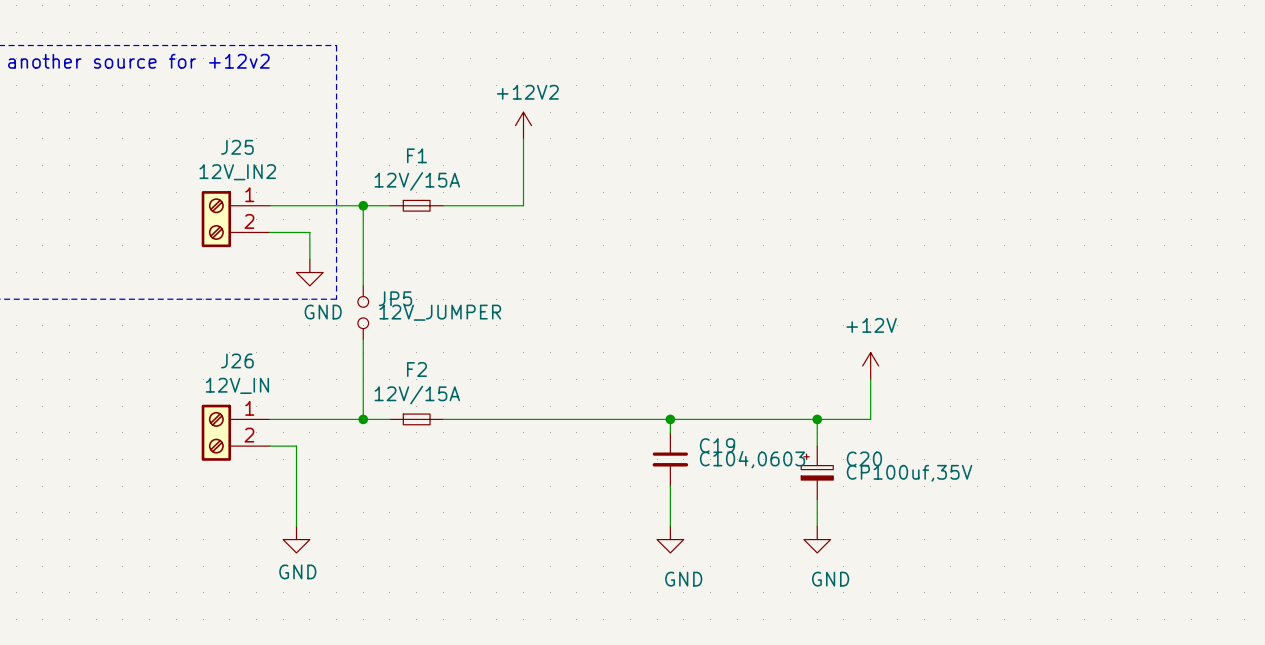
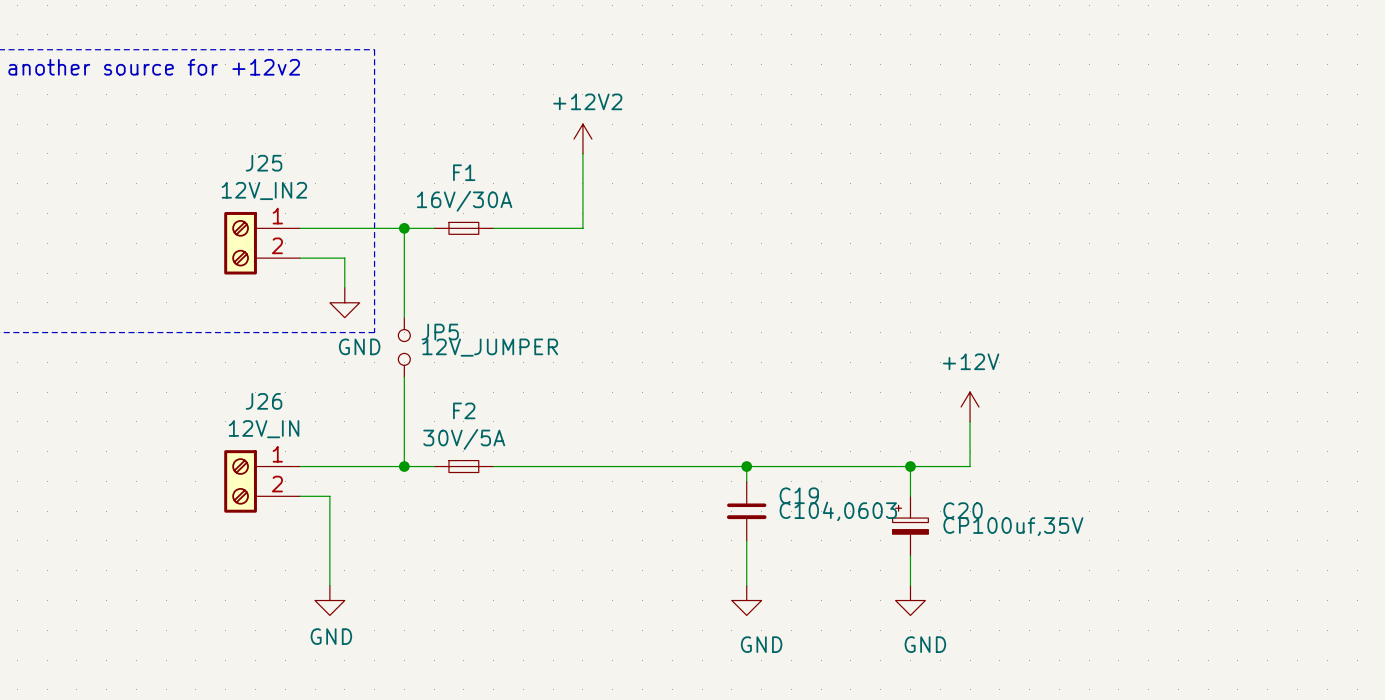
F1 value: 12V/15A (417, 181) -> 16V/30A (464, 201)
F2 value: 12V/15A (417, 395) -> 30V/5A (464, 439)

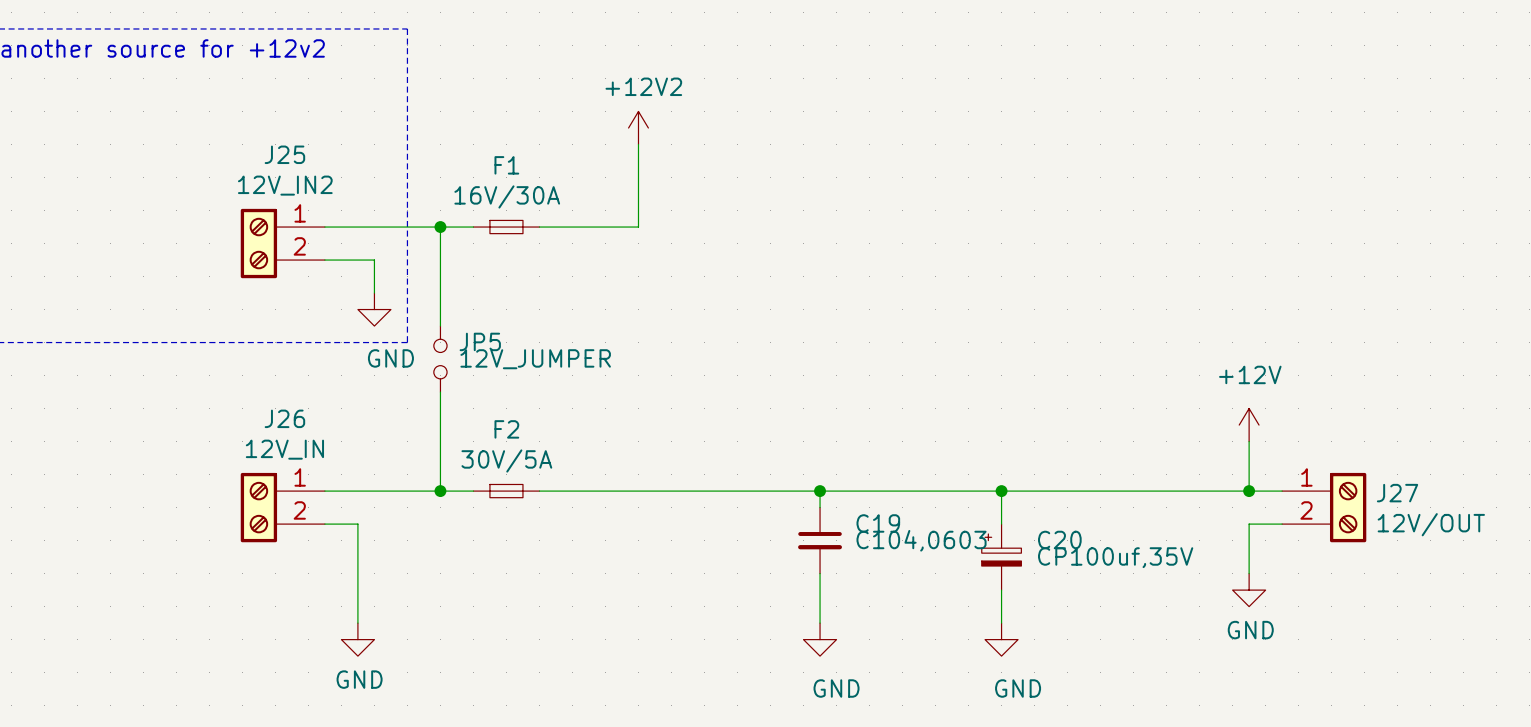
power symbol position: +12V (970, 407) -> +12V (1249, 425)
wire: (970, 421) (970, 466) -> (1282, 491) (1067, 491)
wire: none -> (1249, 441) (1249, 491)
junction: none -> (1249, 491)
J27: none -> 12V/OUT (1324, 507)
wire: none -> (1282, 524) (1249, 524) (1249, 573)
power symbol: none -> GND (1249, 590)

